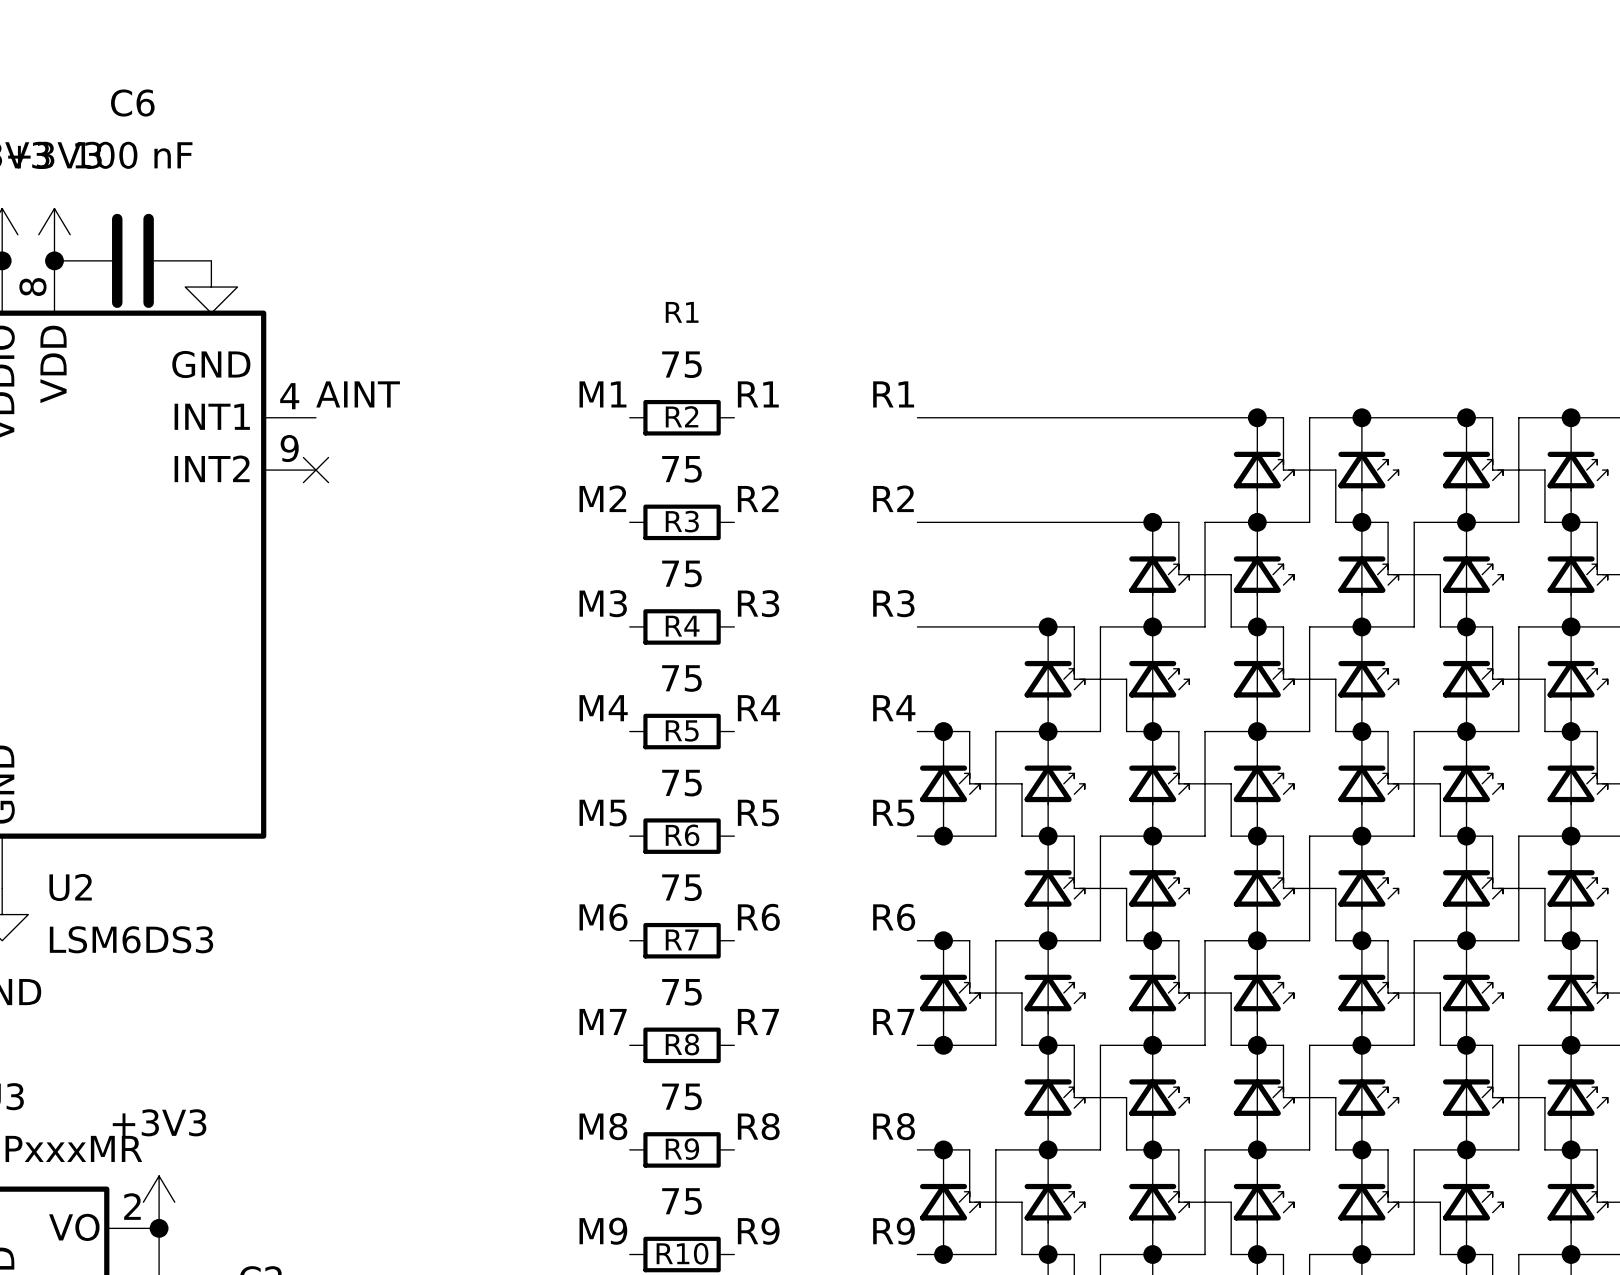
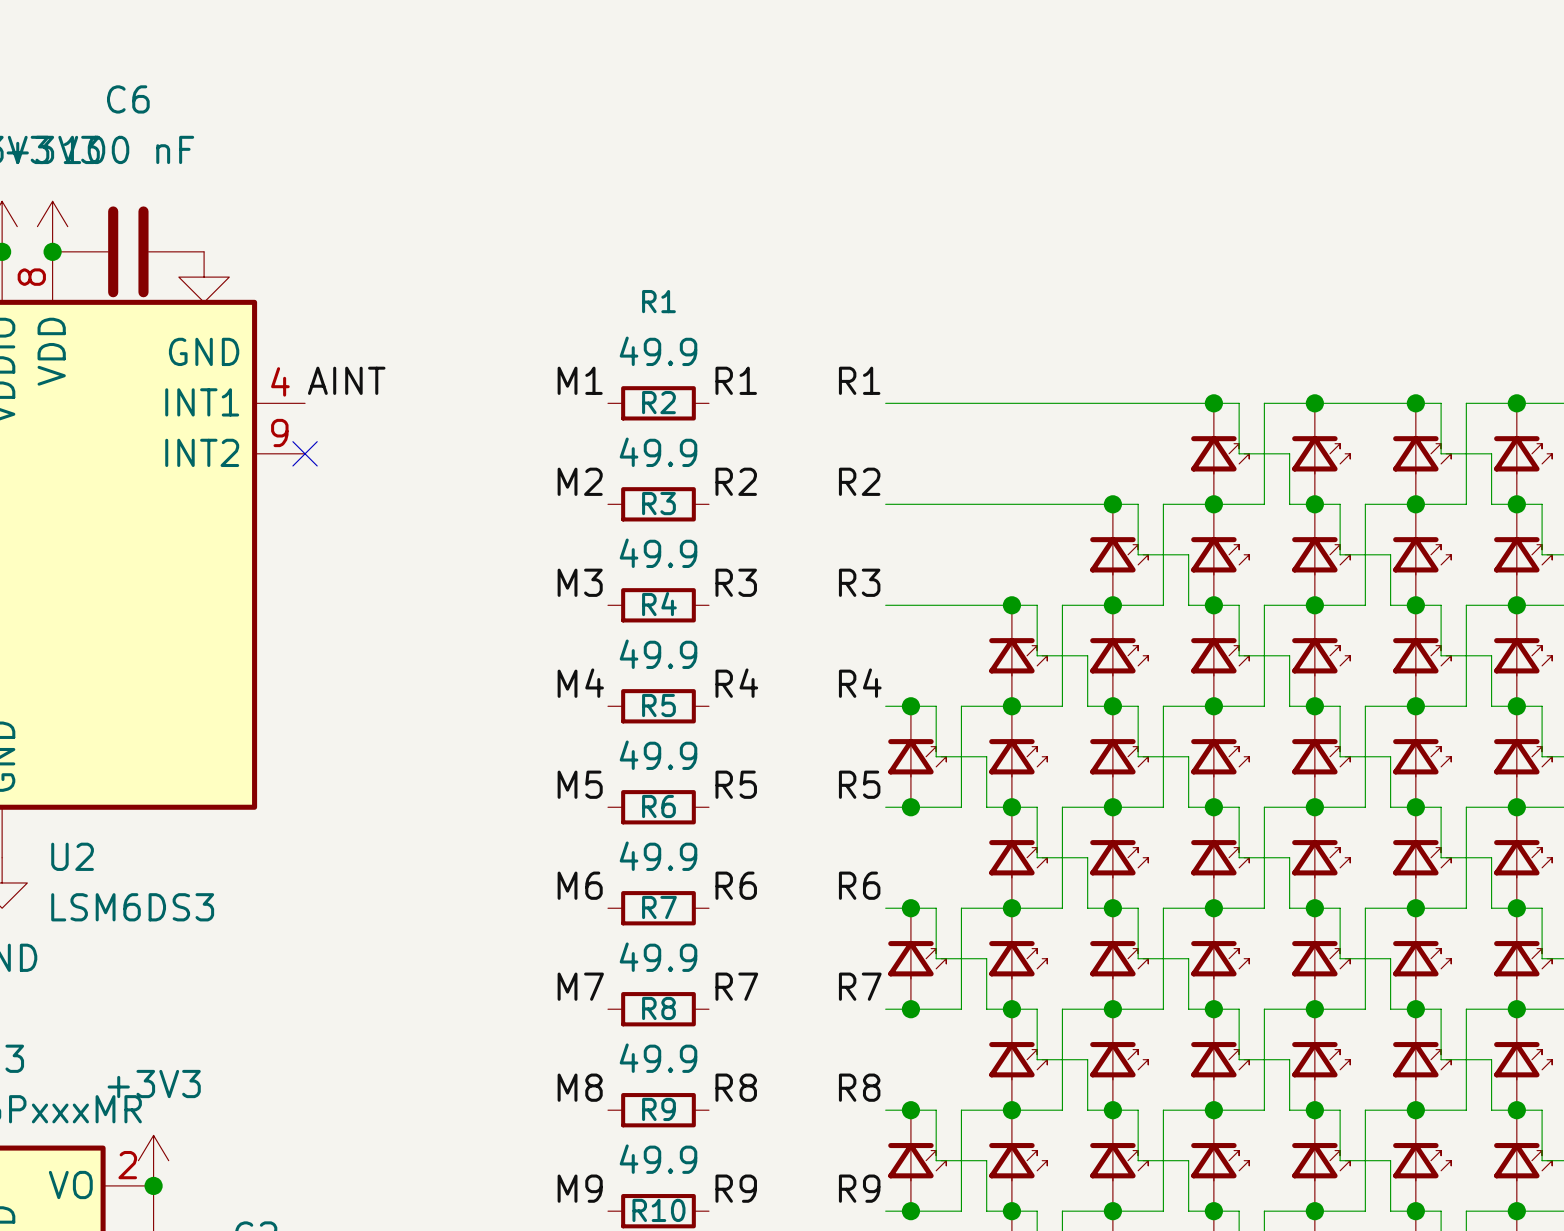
R1 value: 75 (681, 364) -> 49.9 (658, 351)
R2 value: 75 (681, 469) -> 49.9 (658, 452)
R3 value: 75 (681, 573) -> 49.9 (658, 553)
R4 value: 75 (681, 678) -> 49.9 (658, 654)
R5 value: 75 (681, 783) -> 49.9 (658, 755)
R6 value: 75 (681, 887) -> 49.9 (658, 856)
R7 value: 75 (681, 992) -> 49.9 (658, 957)
R8 value: 75 (681, 1096) -> 49.9 (658, 1058)
R9 value: 75 (681, 1201) -> 49.9 (658, 1159)

